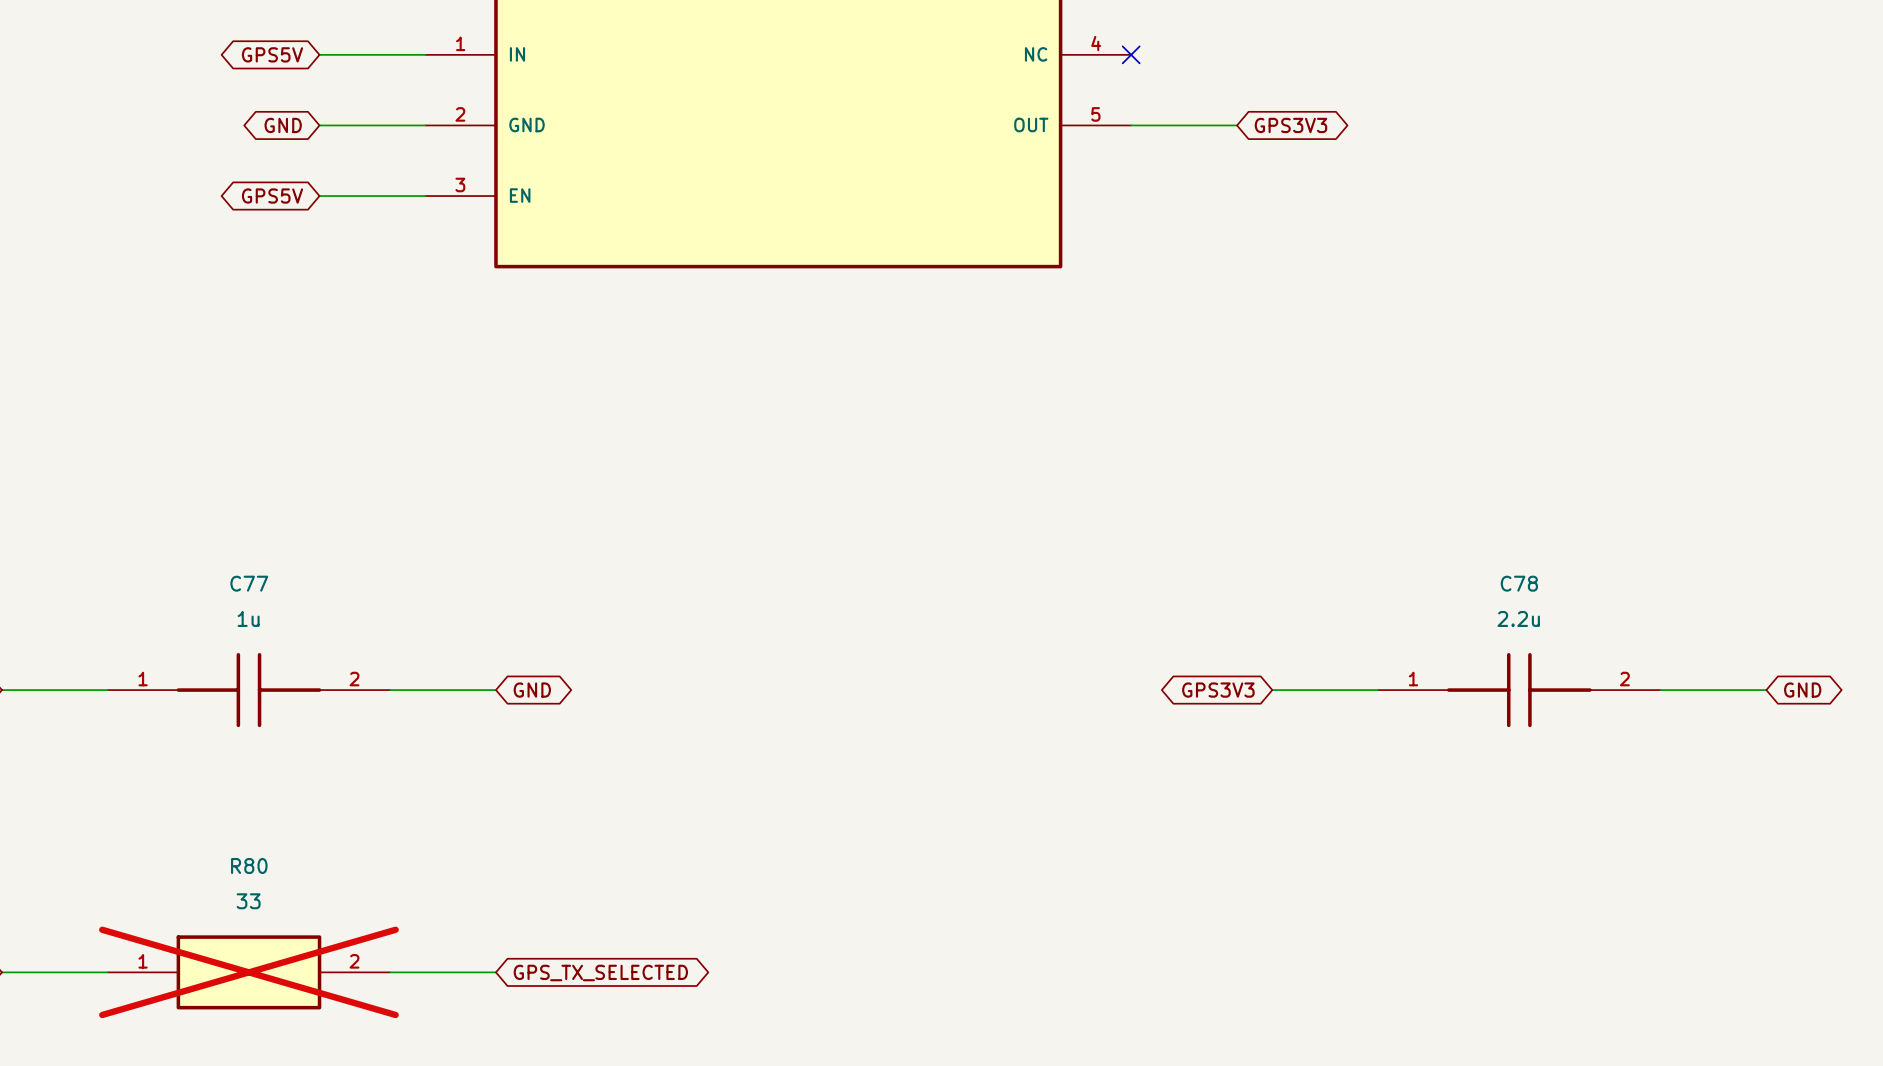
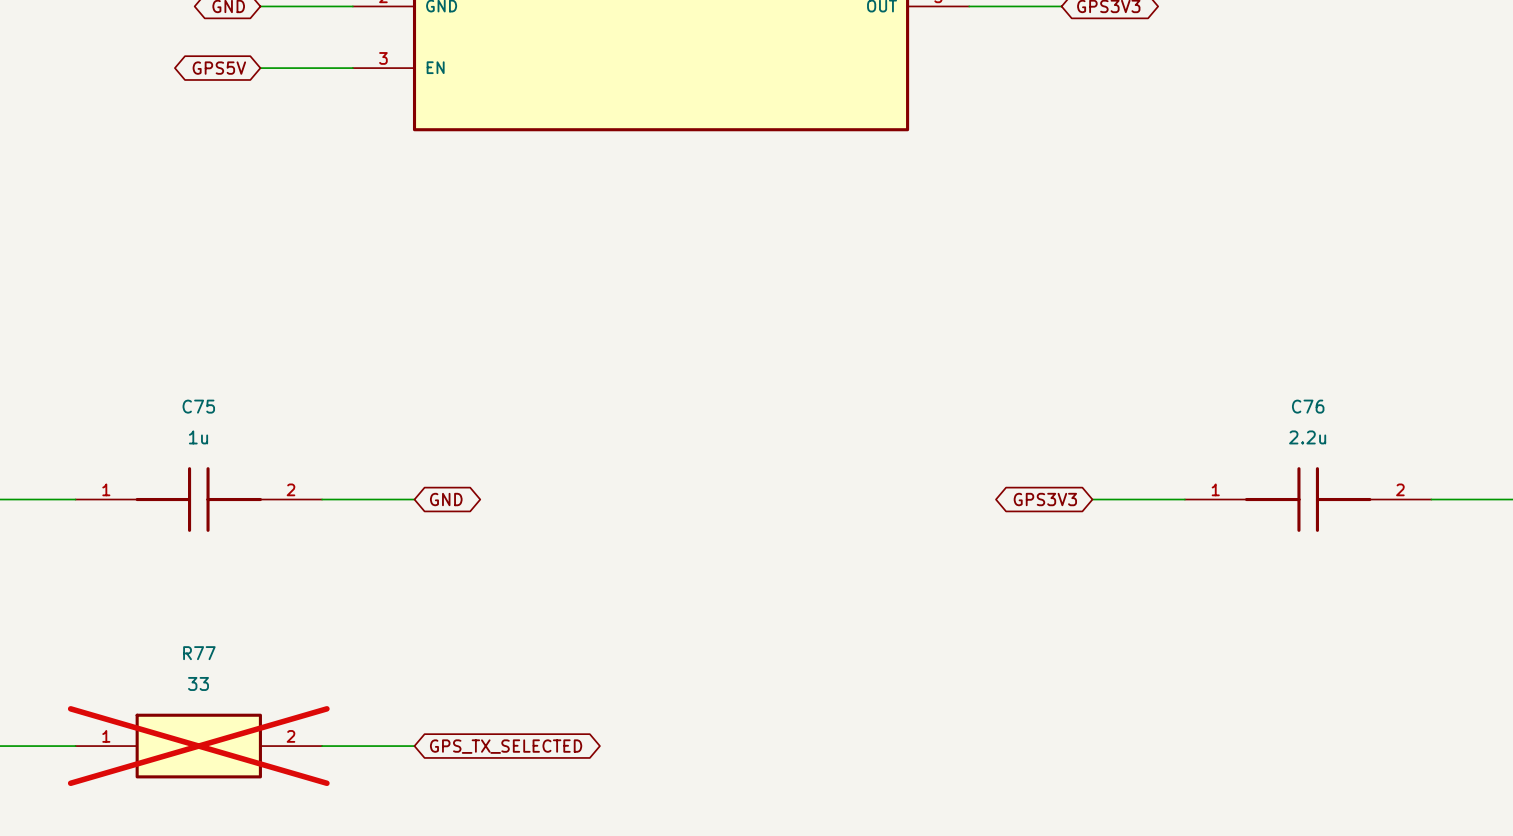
C77 name: C77 (249, 583) -> C75 (198, 406)
C78 name: C78 (1519, 583) -> C76 (1308, 406)
R80 name: R80 (249, 865) -> R77 (199, 653)

